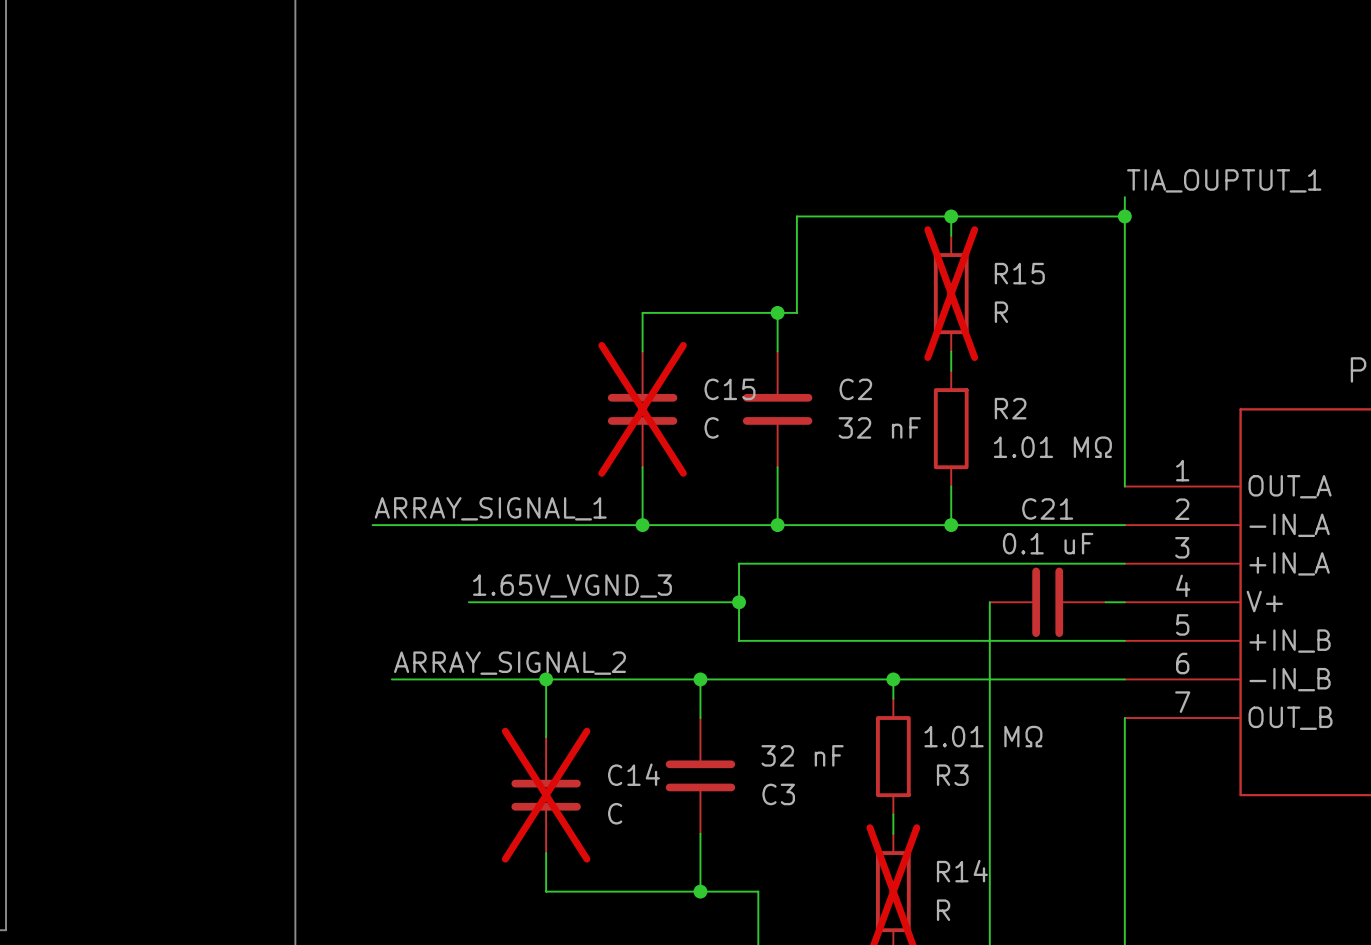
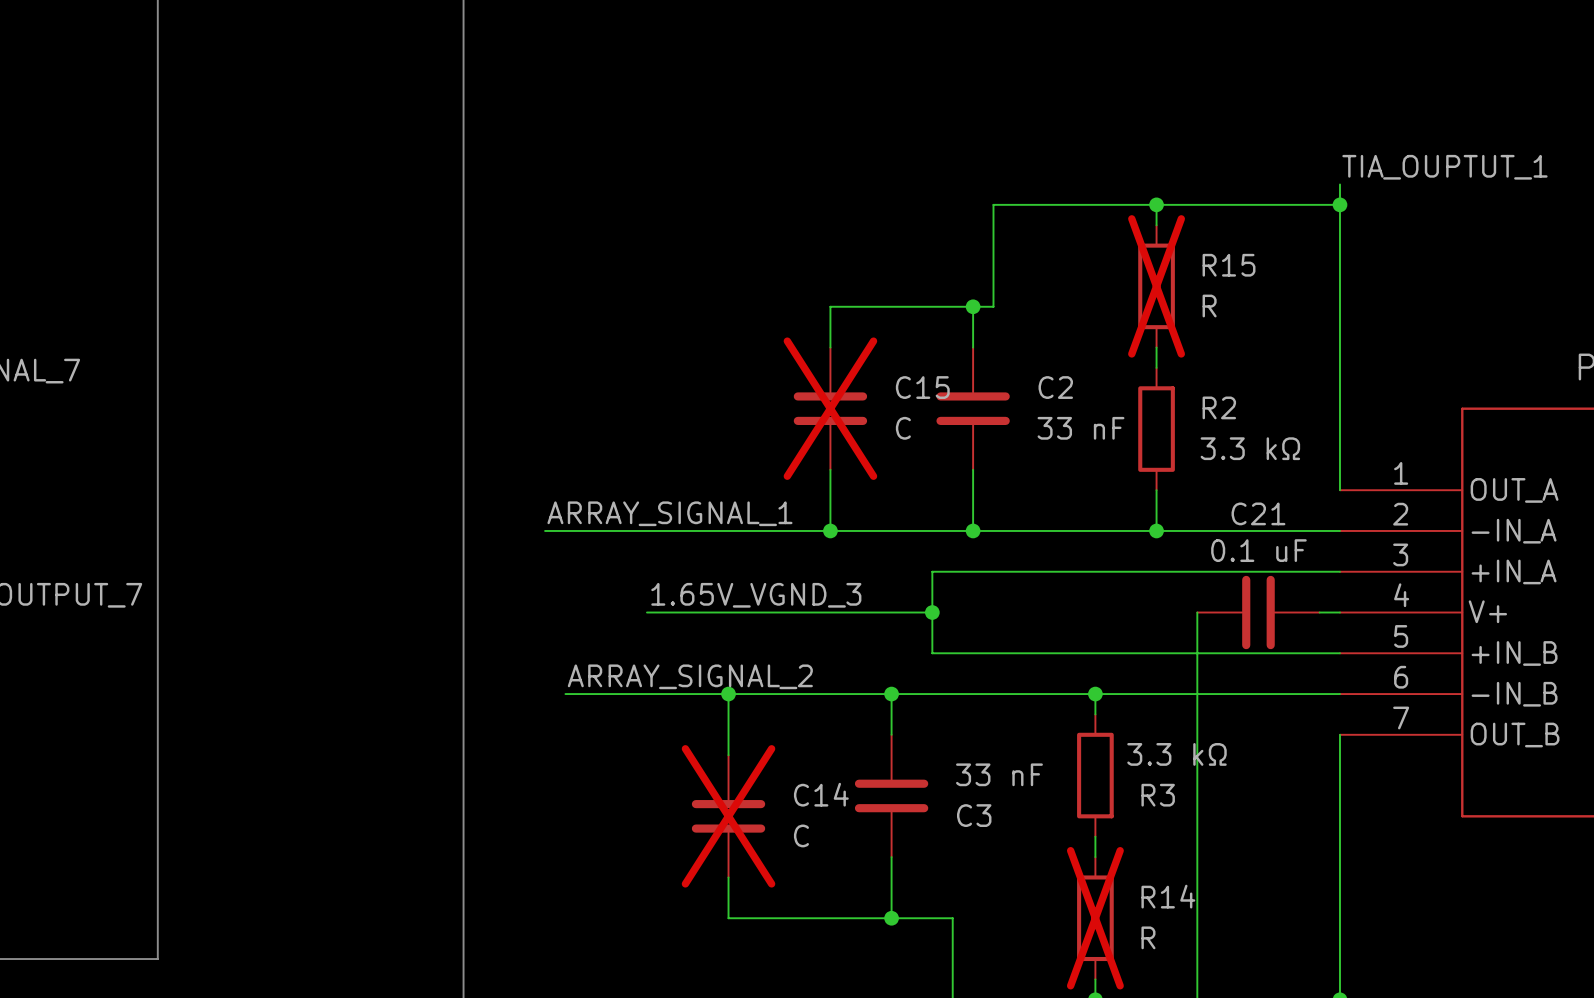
C2 value: 32 nF (879, 427) -> 33 nF (1081, 428)
R2 value: 1.01 MΩ (1052, 447) -> 3.3 kΩ (1250, 448)
R3 value: 1.01 MΩ (983, 736) -> 3.3 kΩ (1176, 754)
C3 value: 32 nF (802, 755) -> 33 nF (999, 774)

